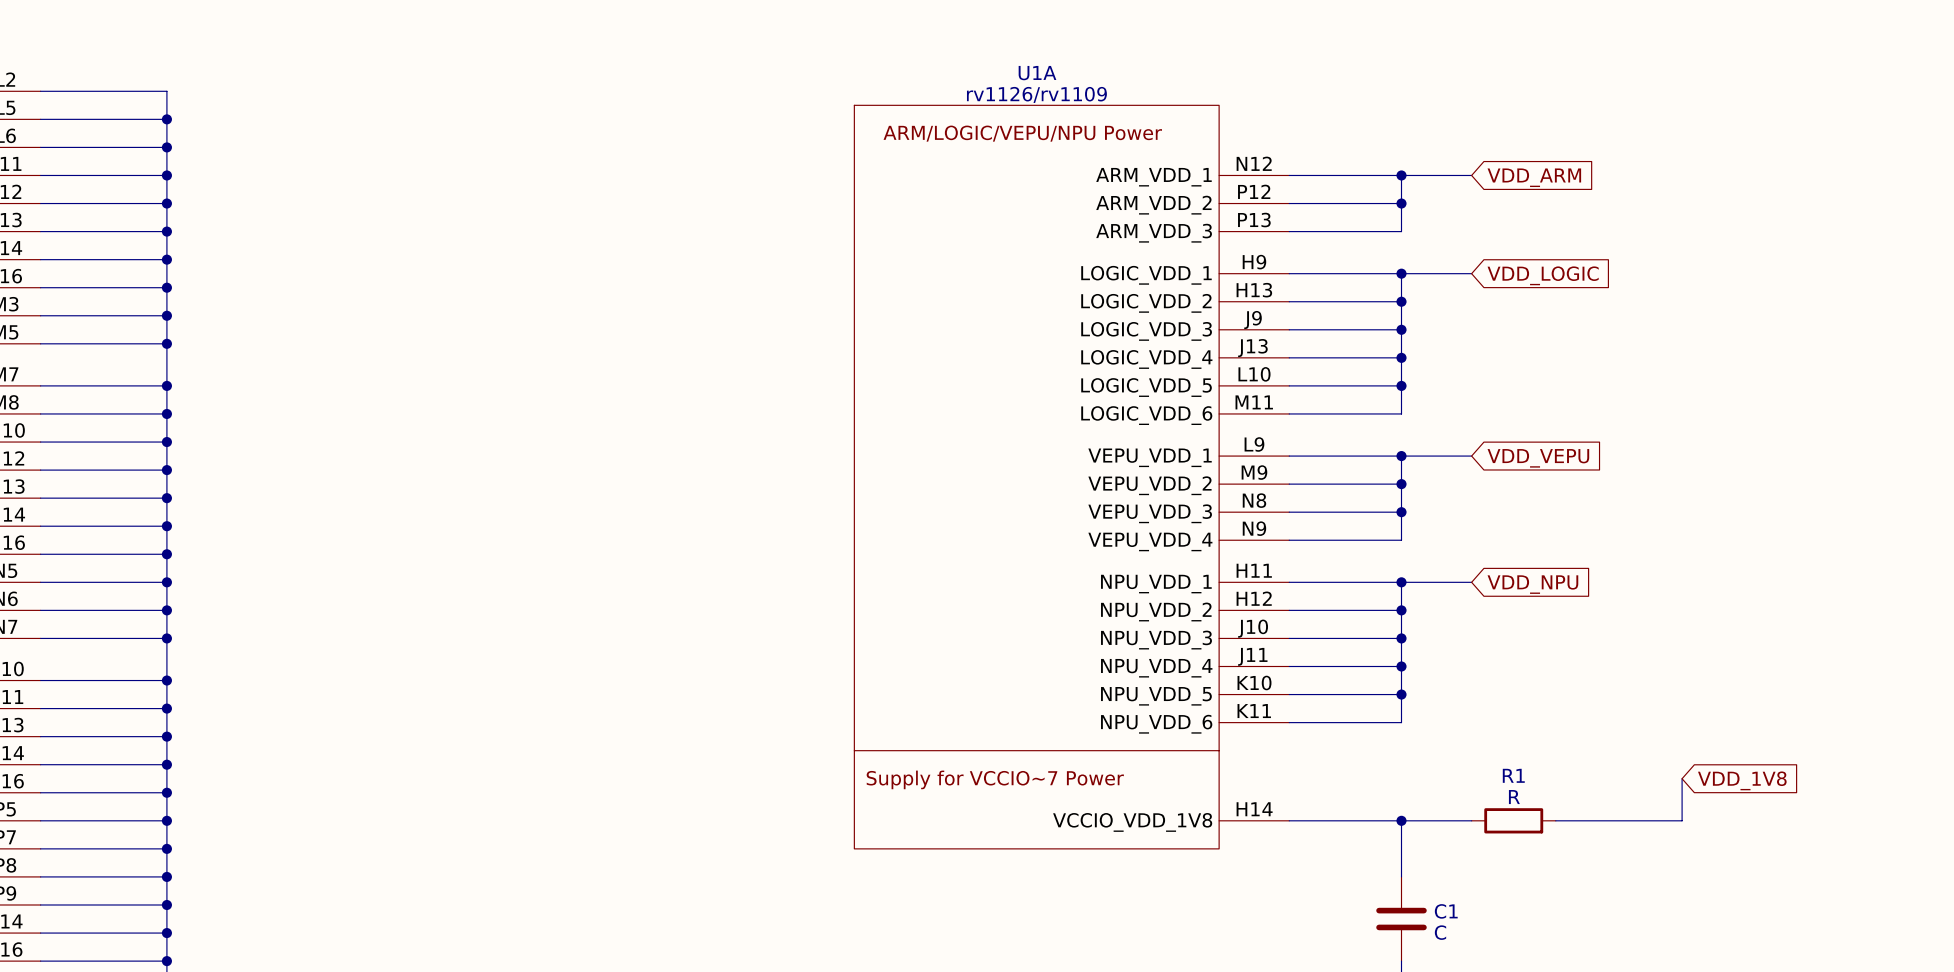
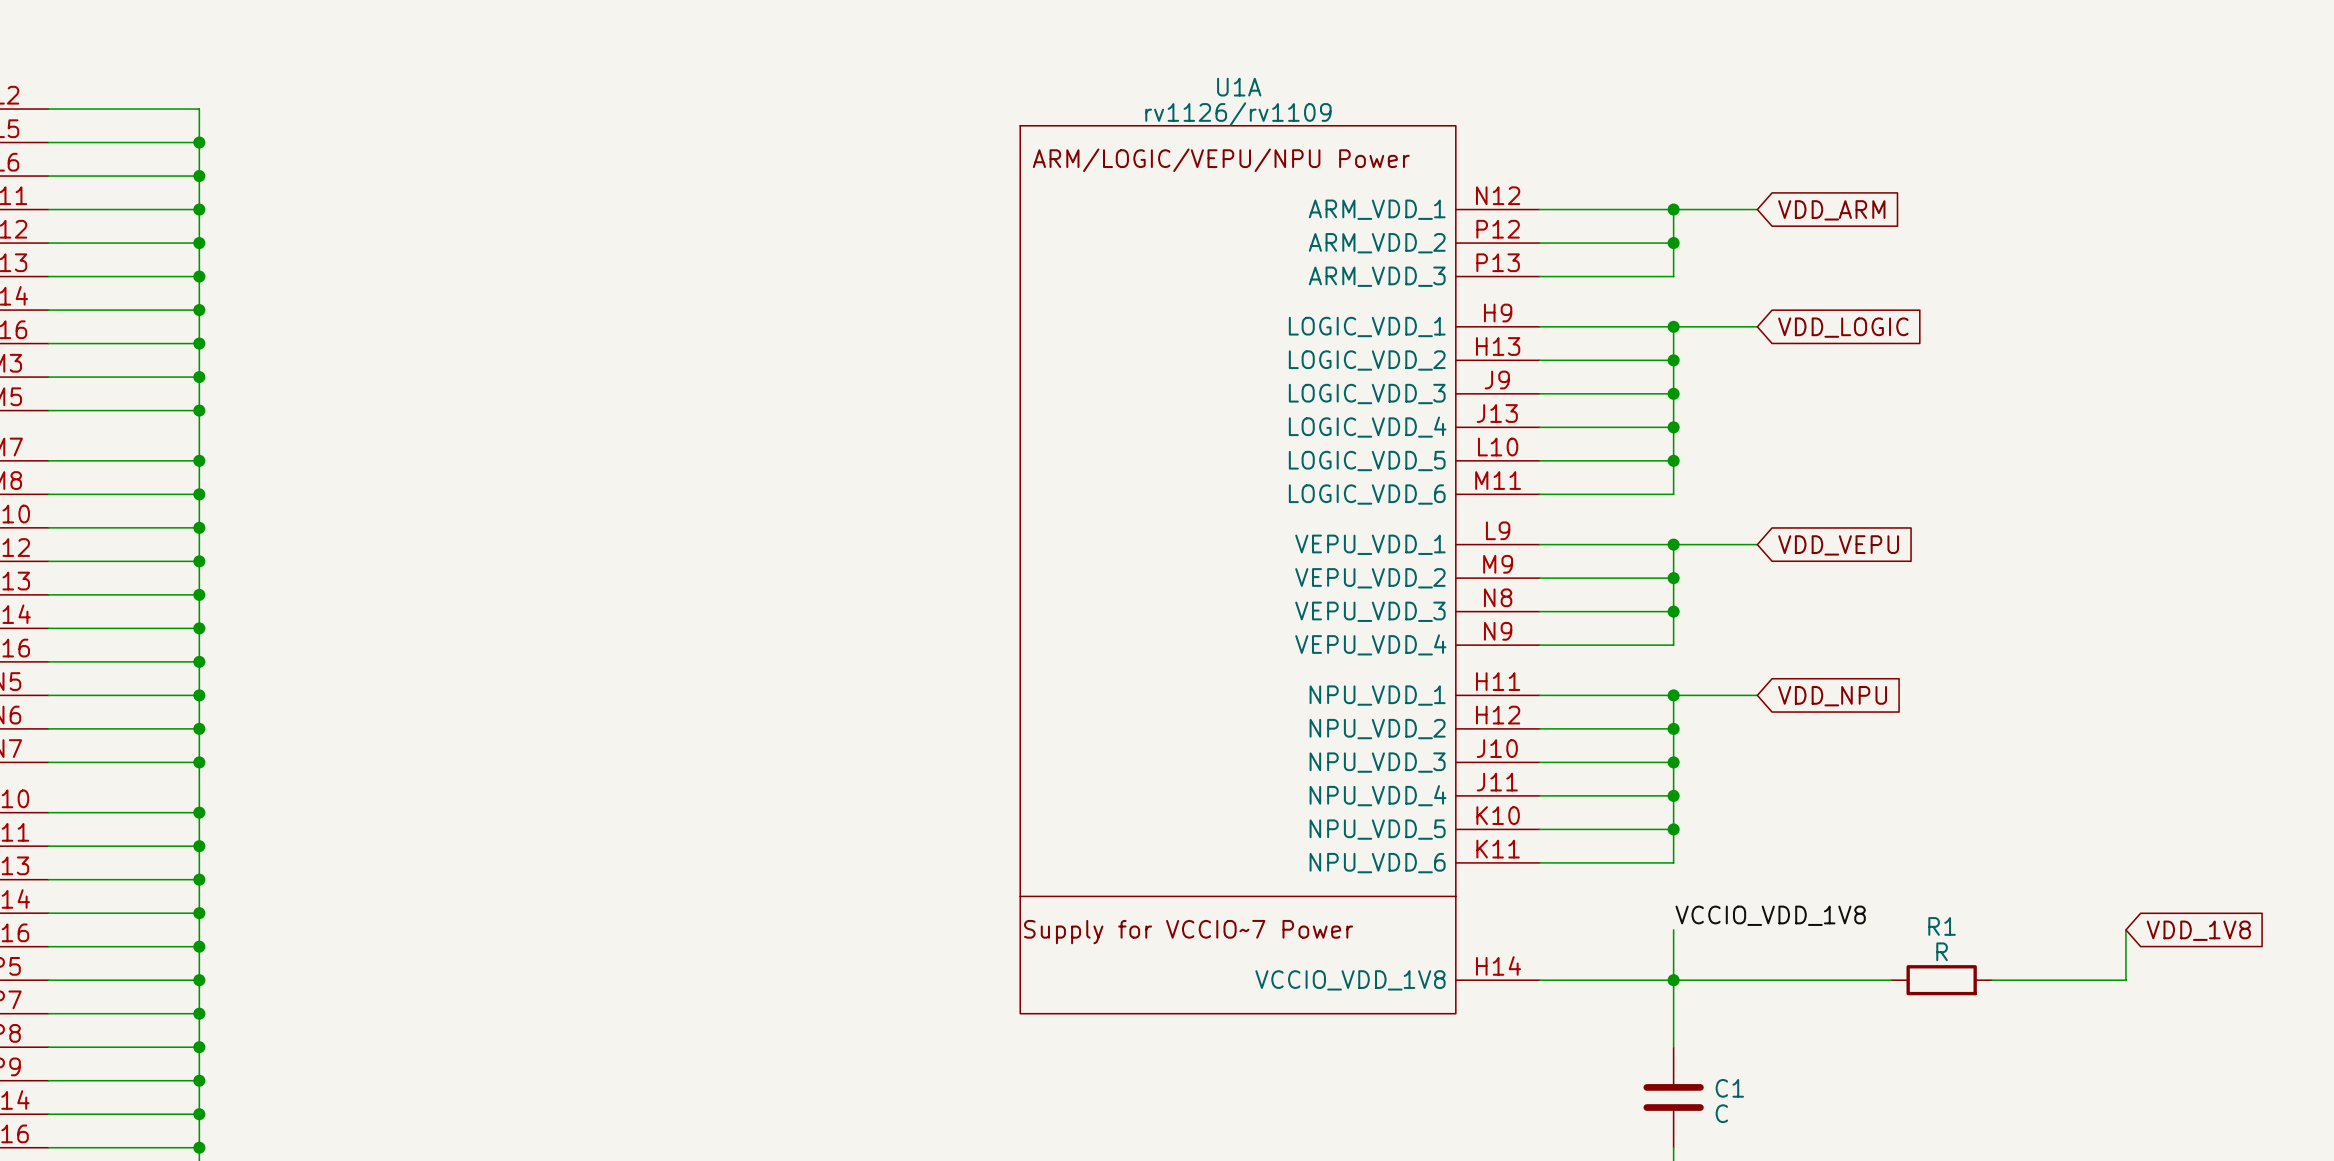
label: none -> VCCIO_VDD_1V8 (1770, 915)
wire: none -> (1673, 929) (1673, 980)
wire: (1682, 778) (1682, 820) -> (2125, 929) (2125, 980) (2008, 980)
global label position: VDD_1V8 (1742, 780) -> VDD_1V8 (2198, 930)
R1 position: (1513, 820) -> (1941, 980)
wire: (1583, 820) (1668, 820) -> (1757, 980) (1857, 980)

